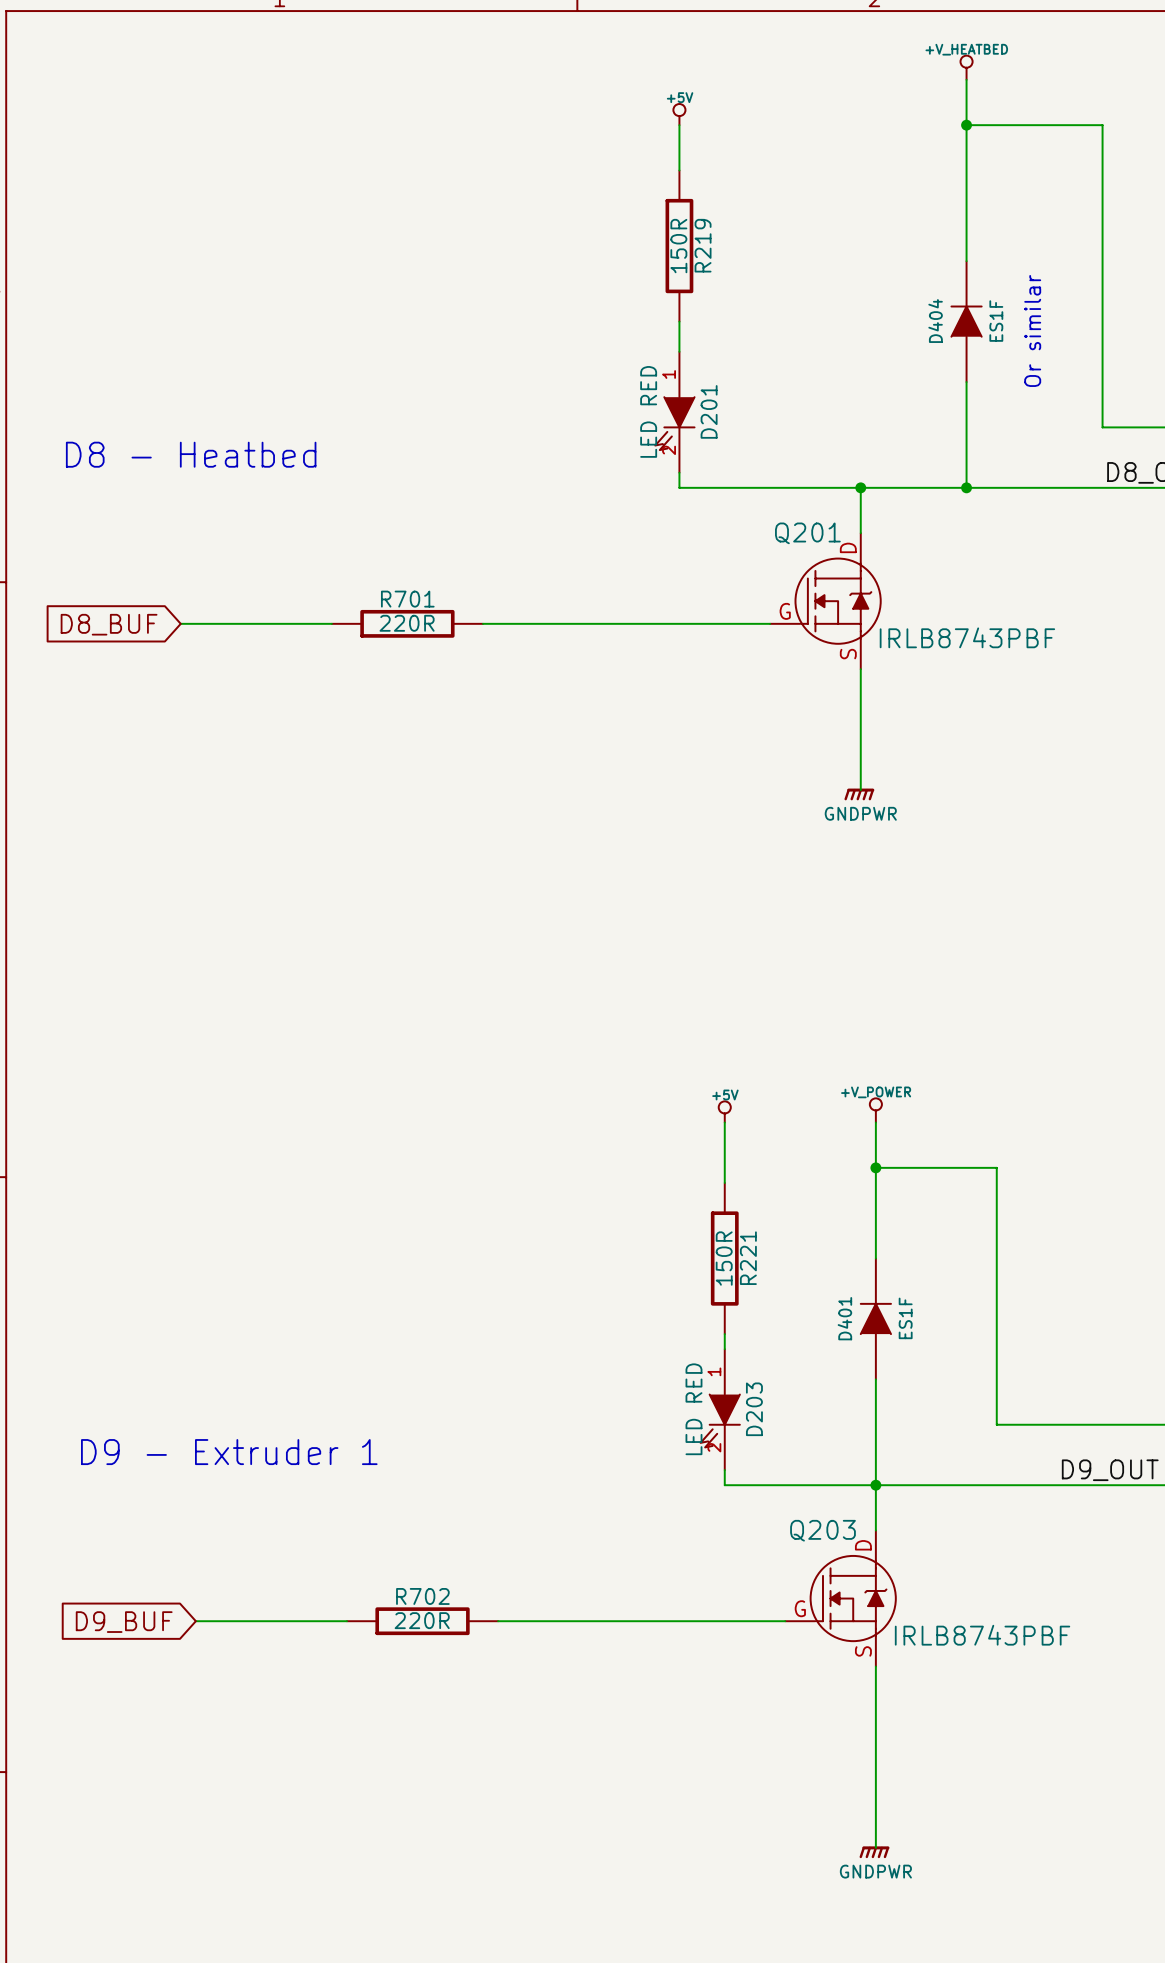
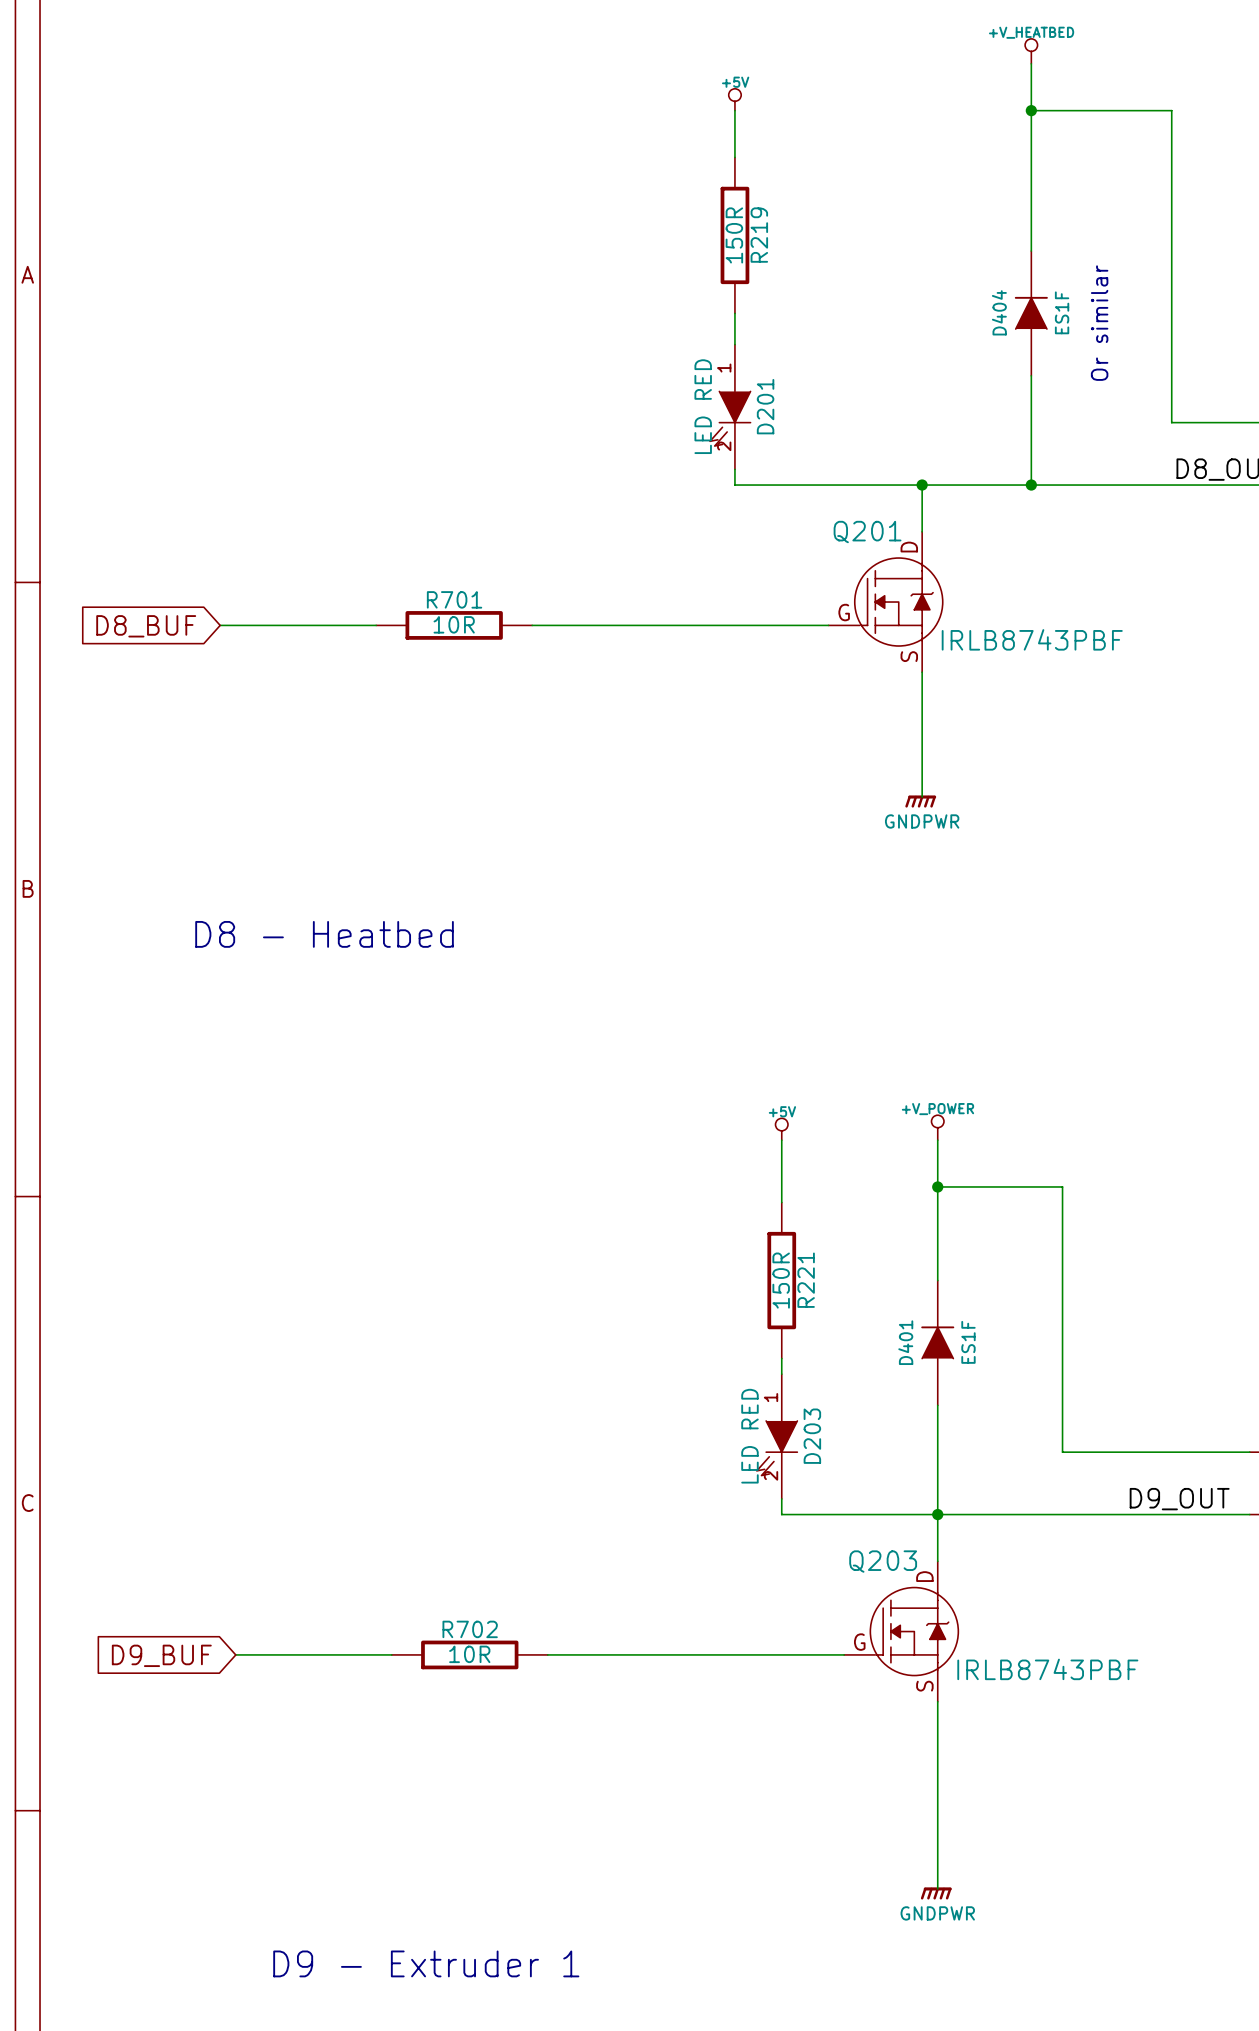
text: D8 - Heatbed (191, 454) -> none
R701 value: 220R (407, 623) -> 10R (454, 624)
text: none -> D8 - Heatbed (324, 934)
text: D9 - Extruder 1 (229, 1452) -> none
R702 value: 220R (422, 1620) -> 10R (469, 1654)
text: none -> D9 - Extruder 1 (426, 1963)

